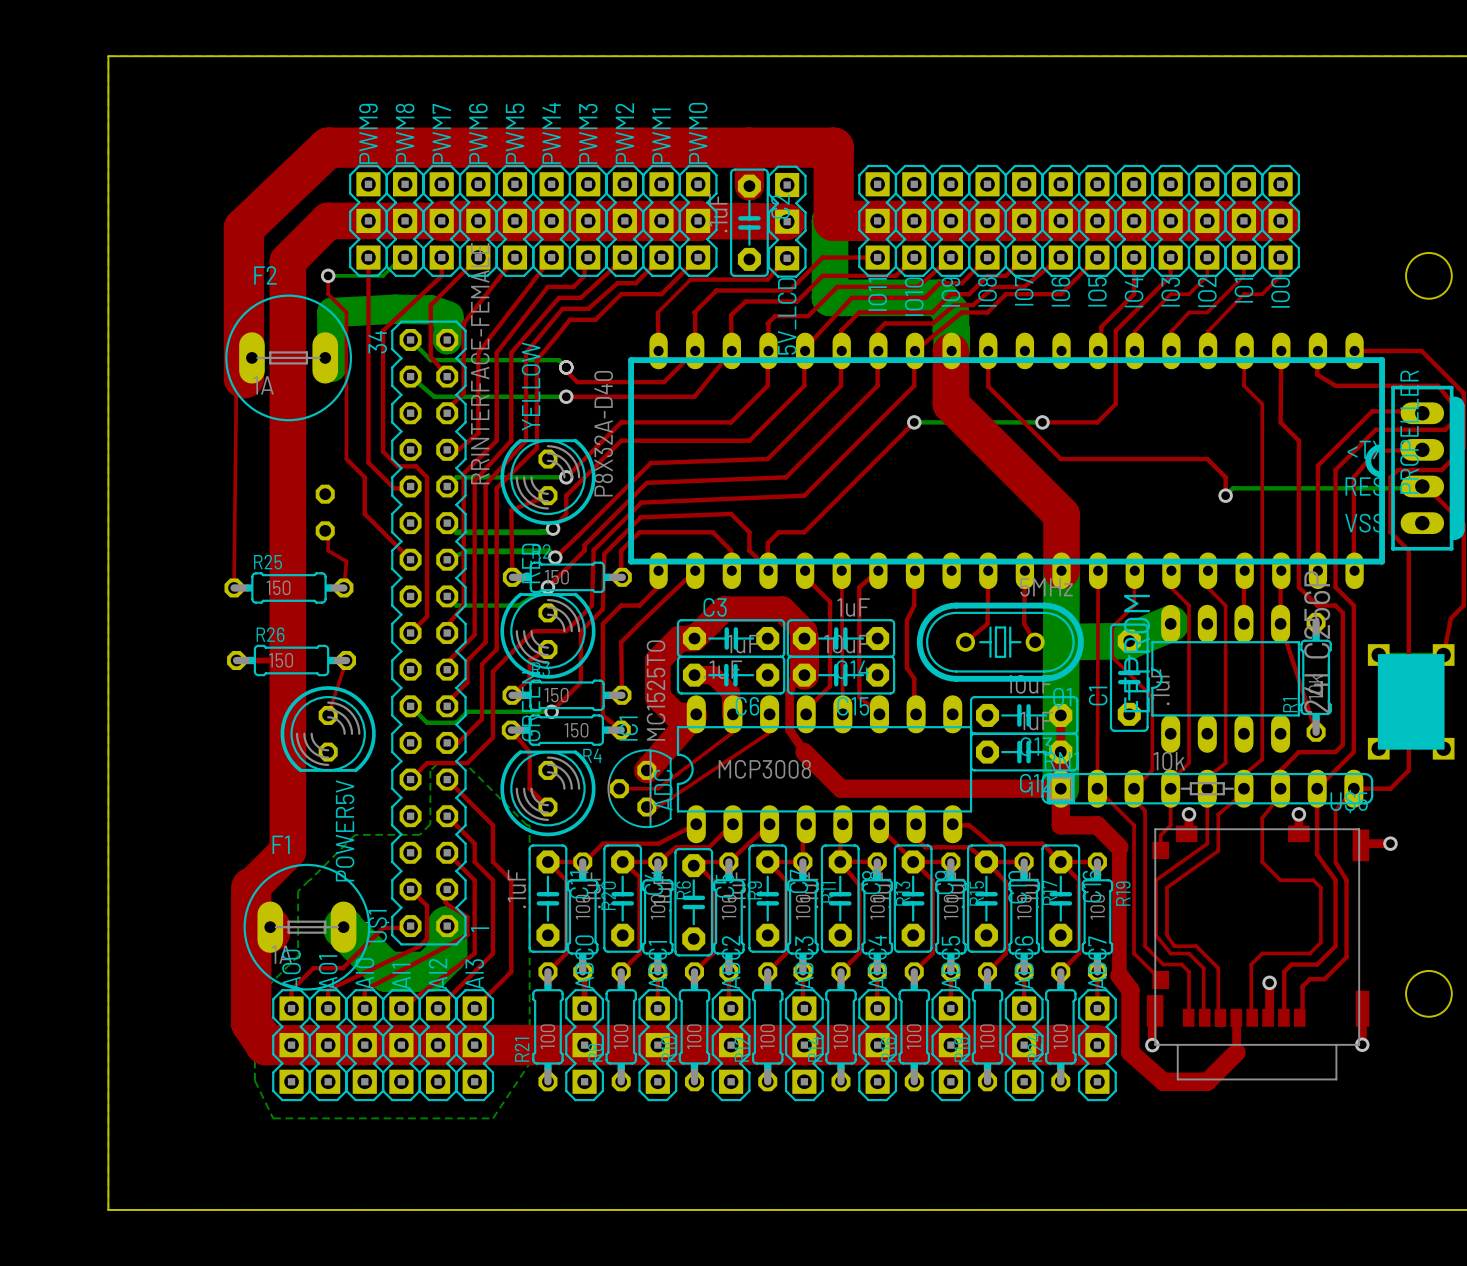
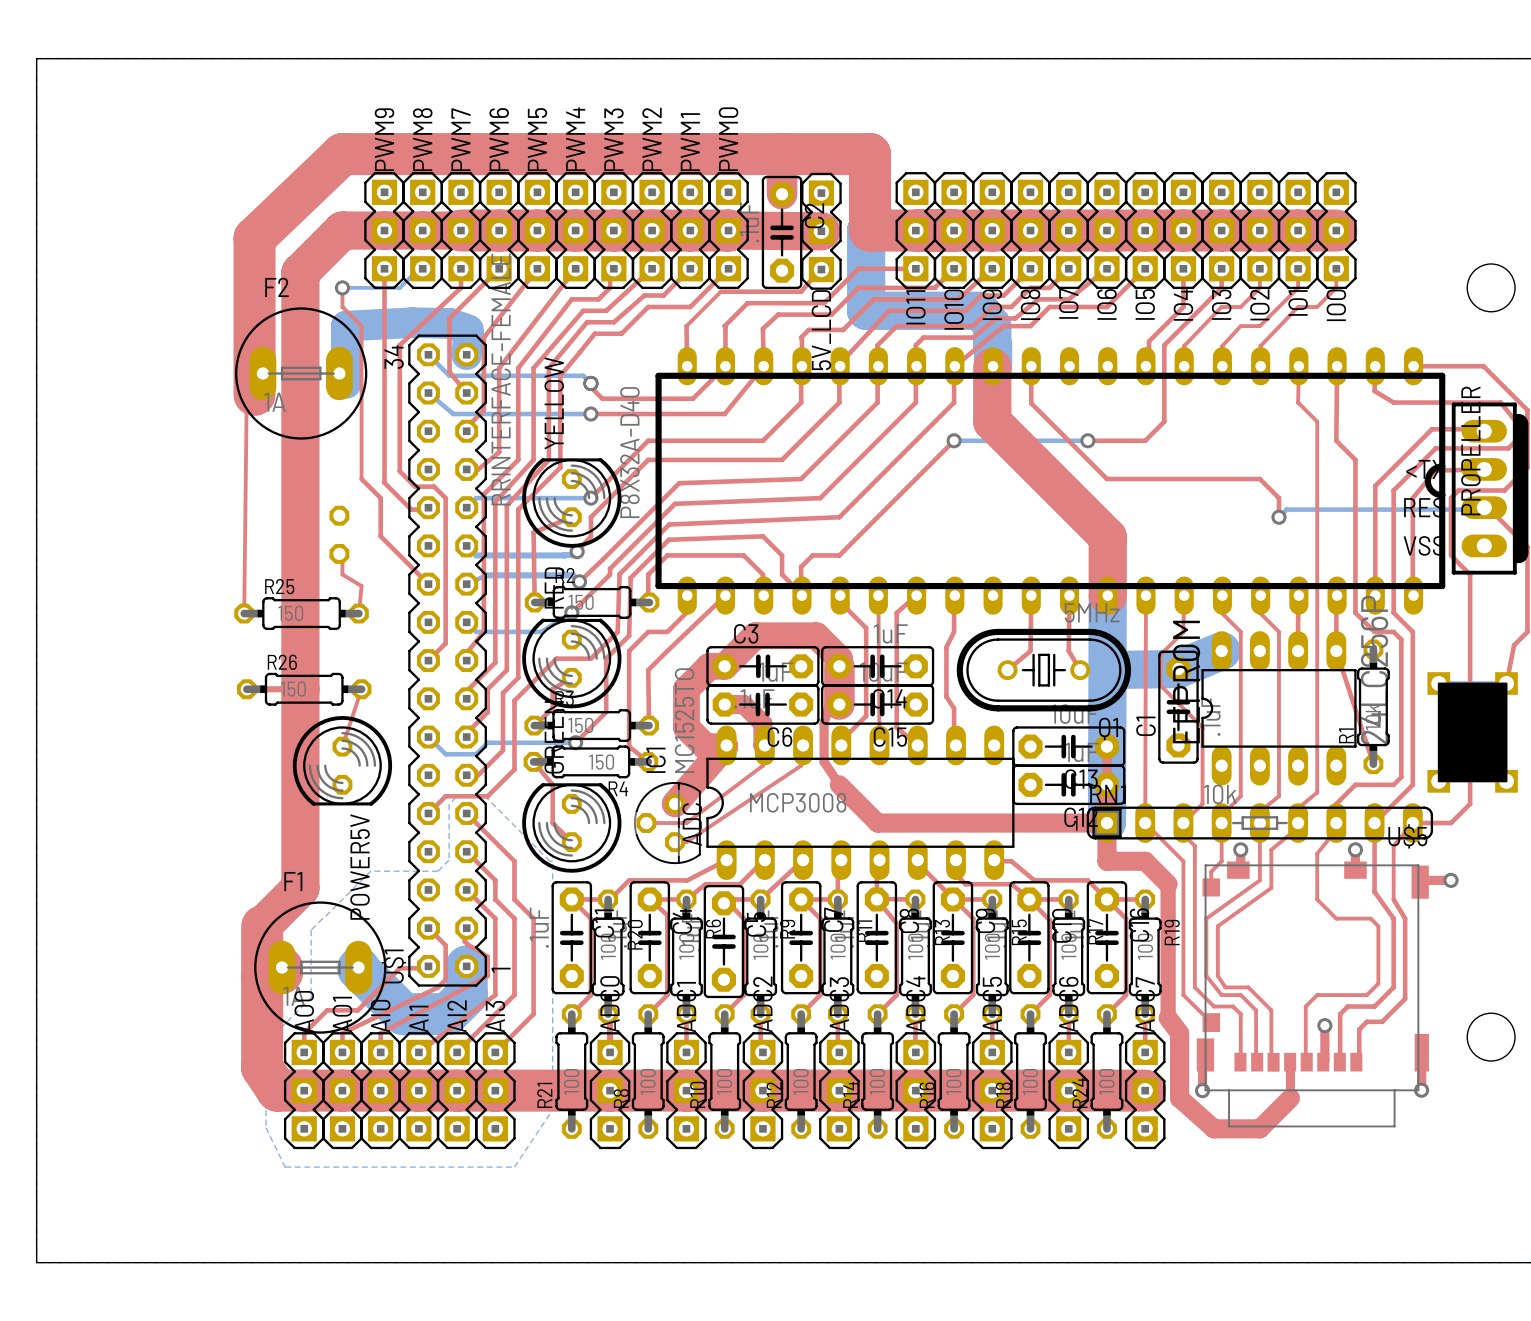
board edge: (108, 56) (108, 1209) -> (113, 58) (36, 58) (36, 1262) (113, 1262)

